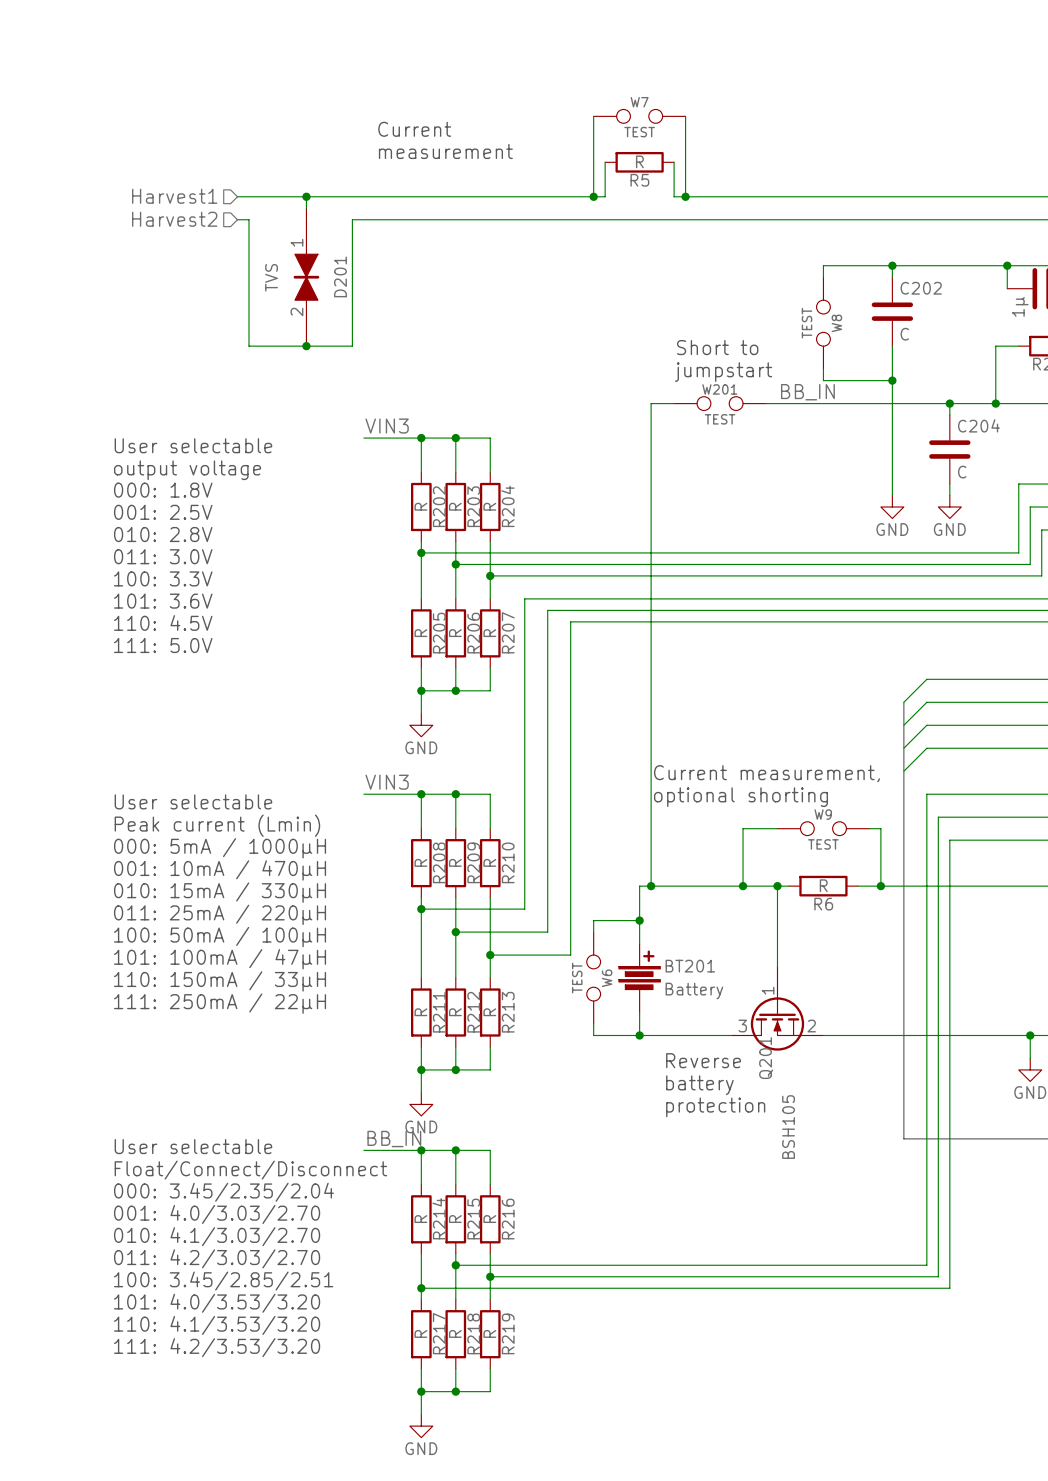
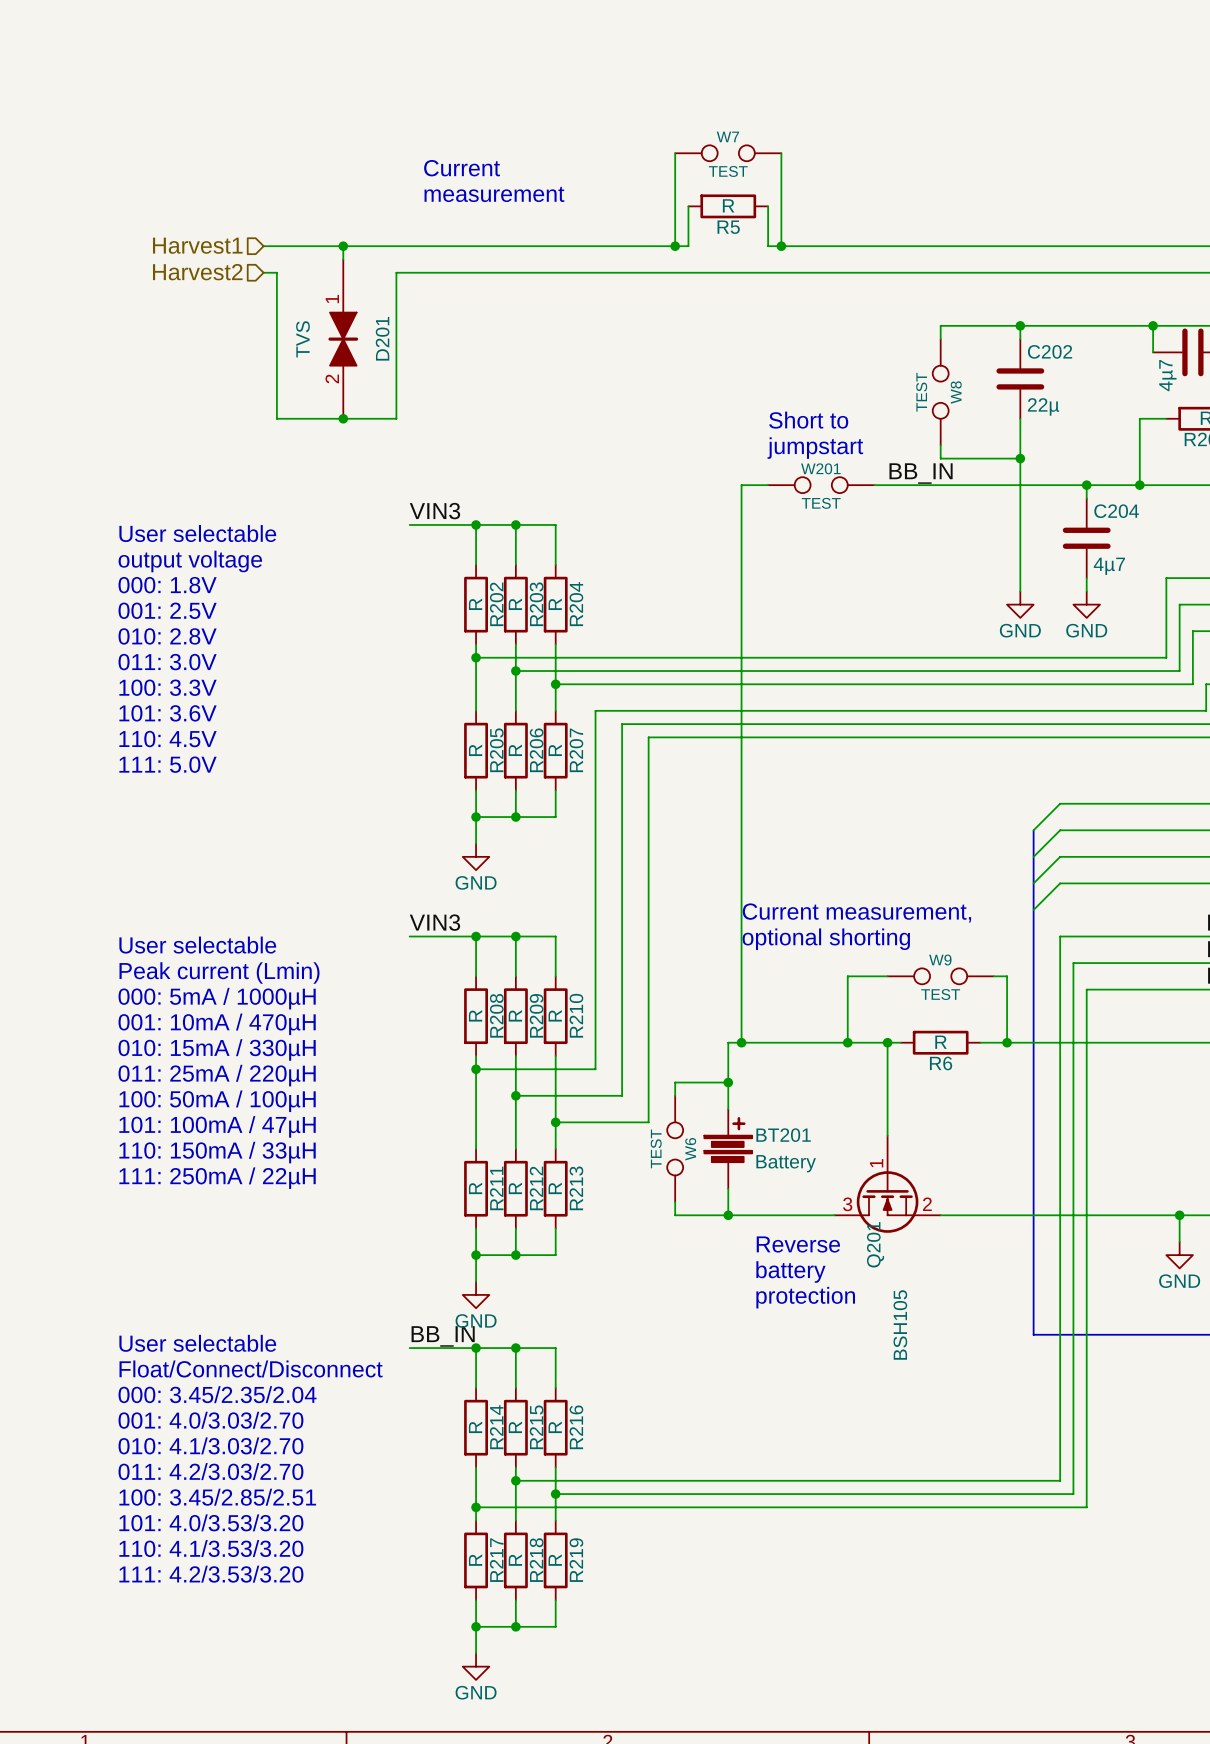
part value: 1µ (1020, 306) -> 4µ7 (1167, 375)
C202 value: C (904, 334) -> 22µ (1043, 406)
C204 value: C (962, 472) -> 4µ7 (1109, 566)

